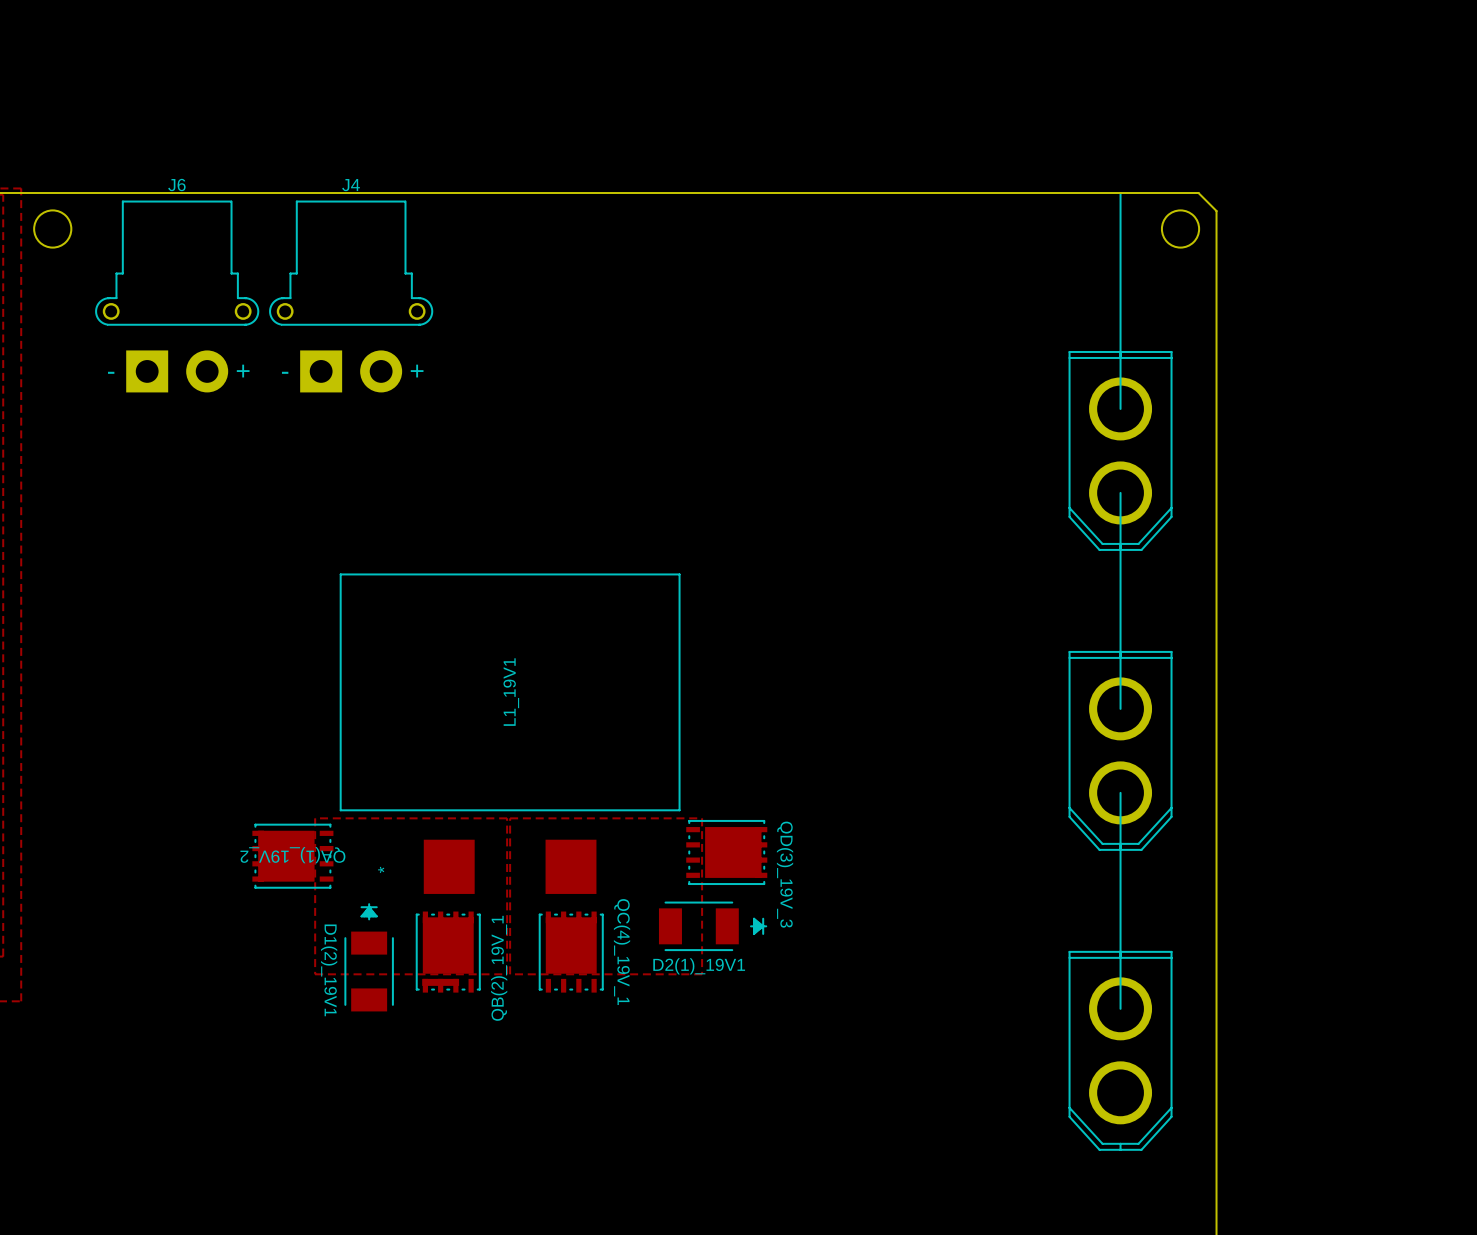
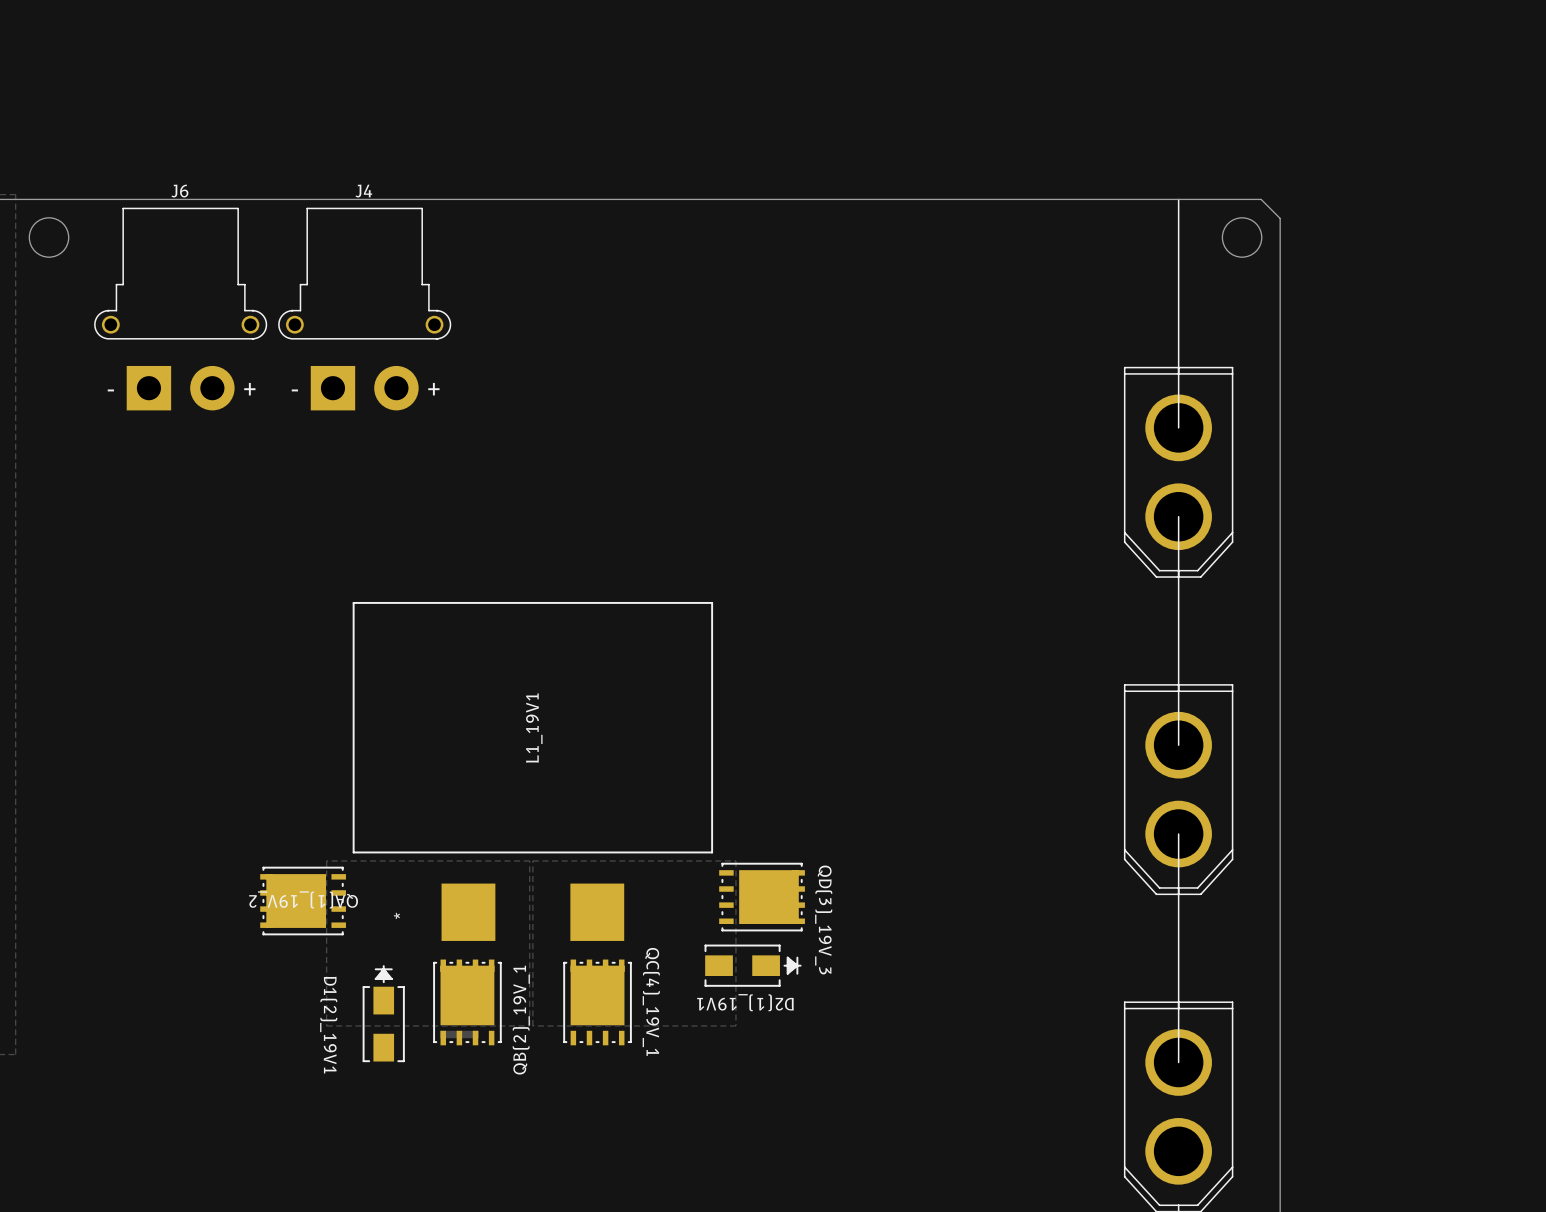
D2(1)_19V1 footprint: [658, 901, 768, 952] -> [704, 944, 802, 987]
D1(2)_19V1 footprint: [344, 903, 394, 1012] -> [362, 965, 405, 1063]

